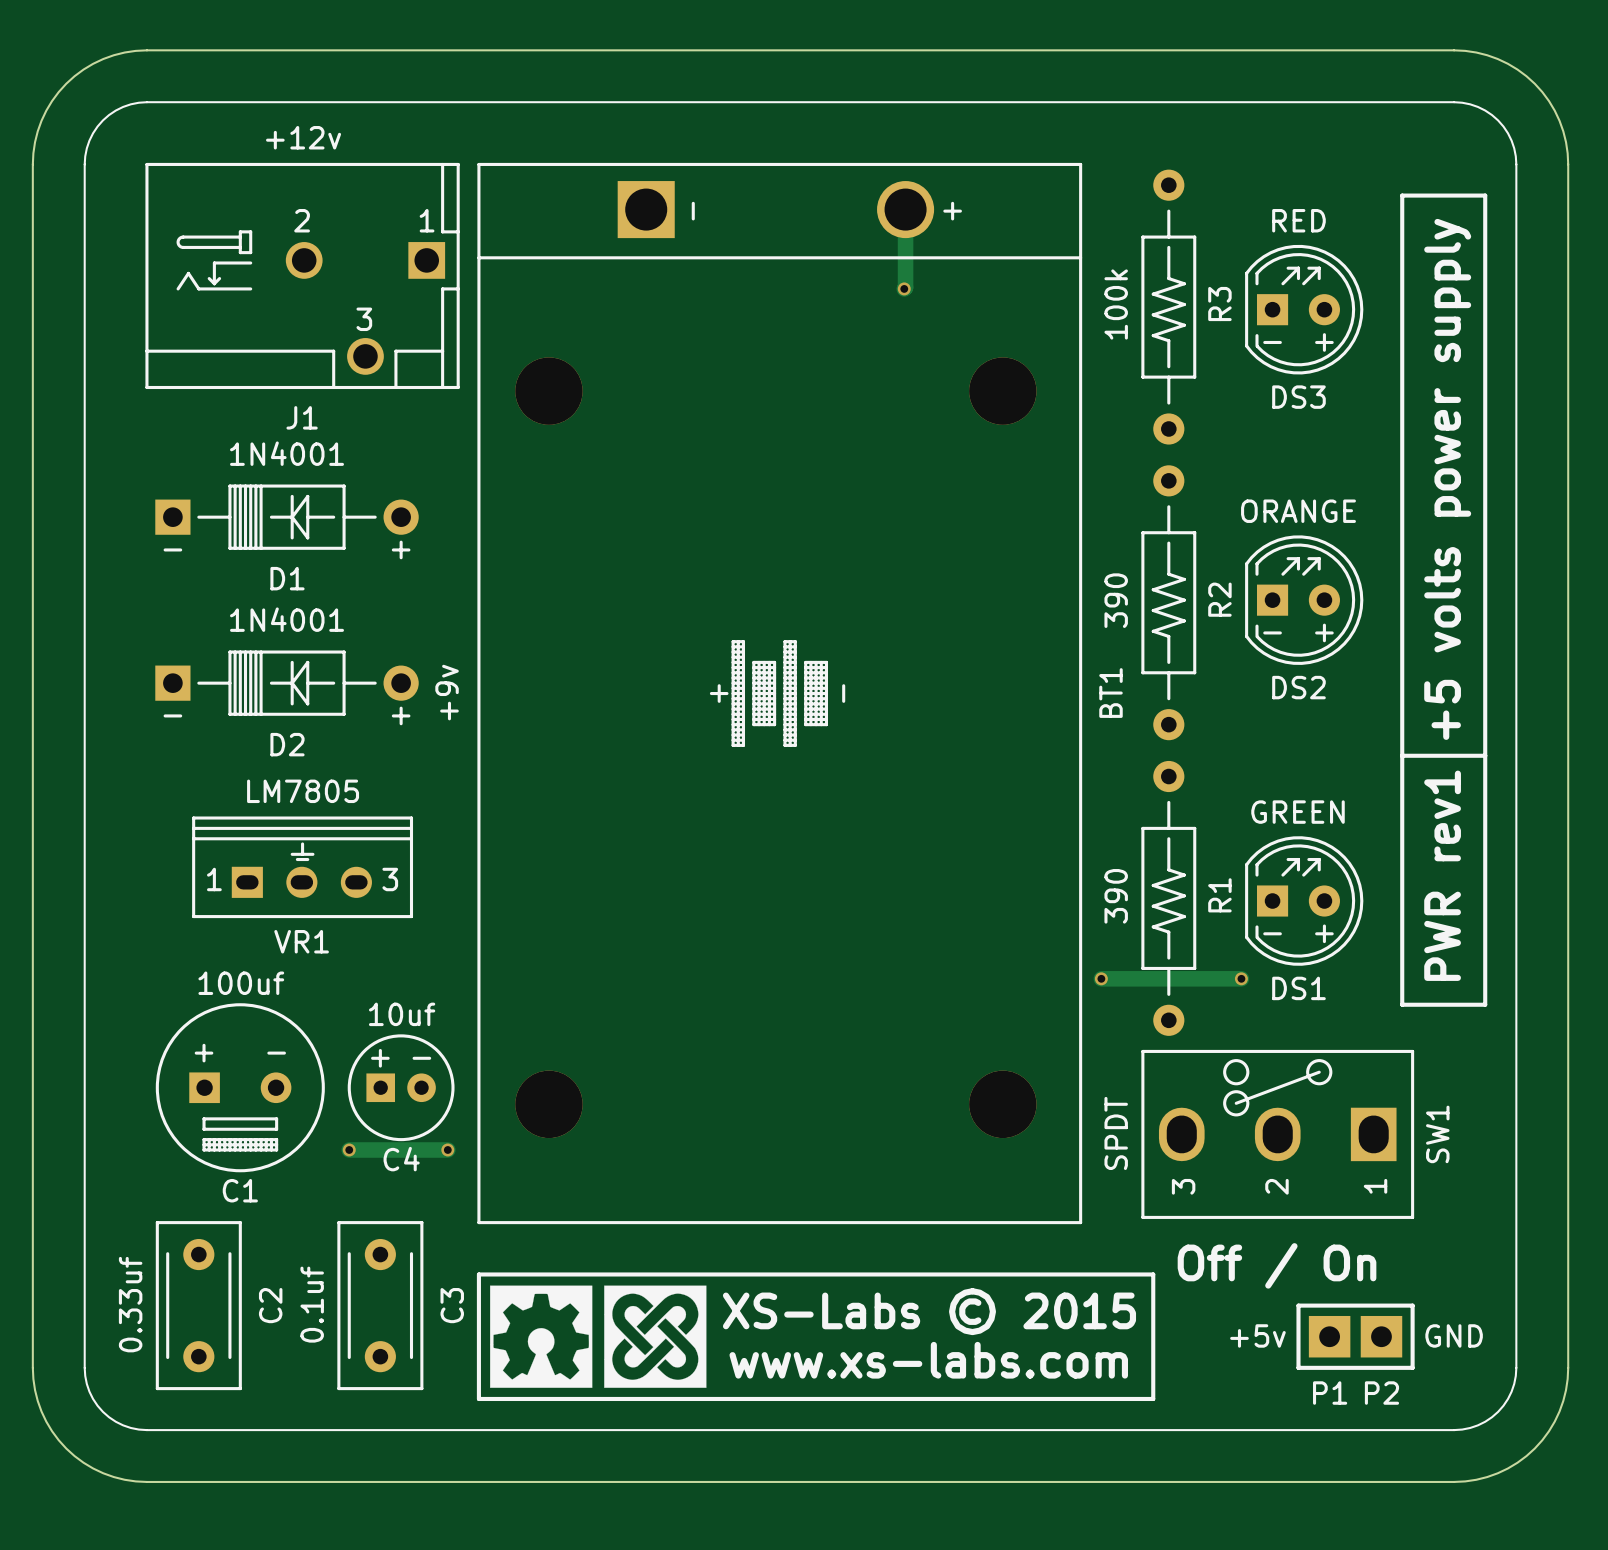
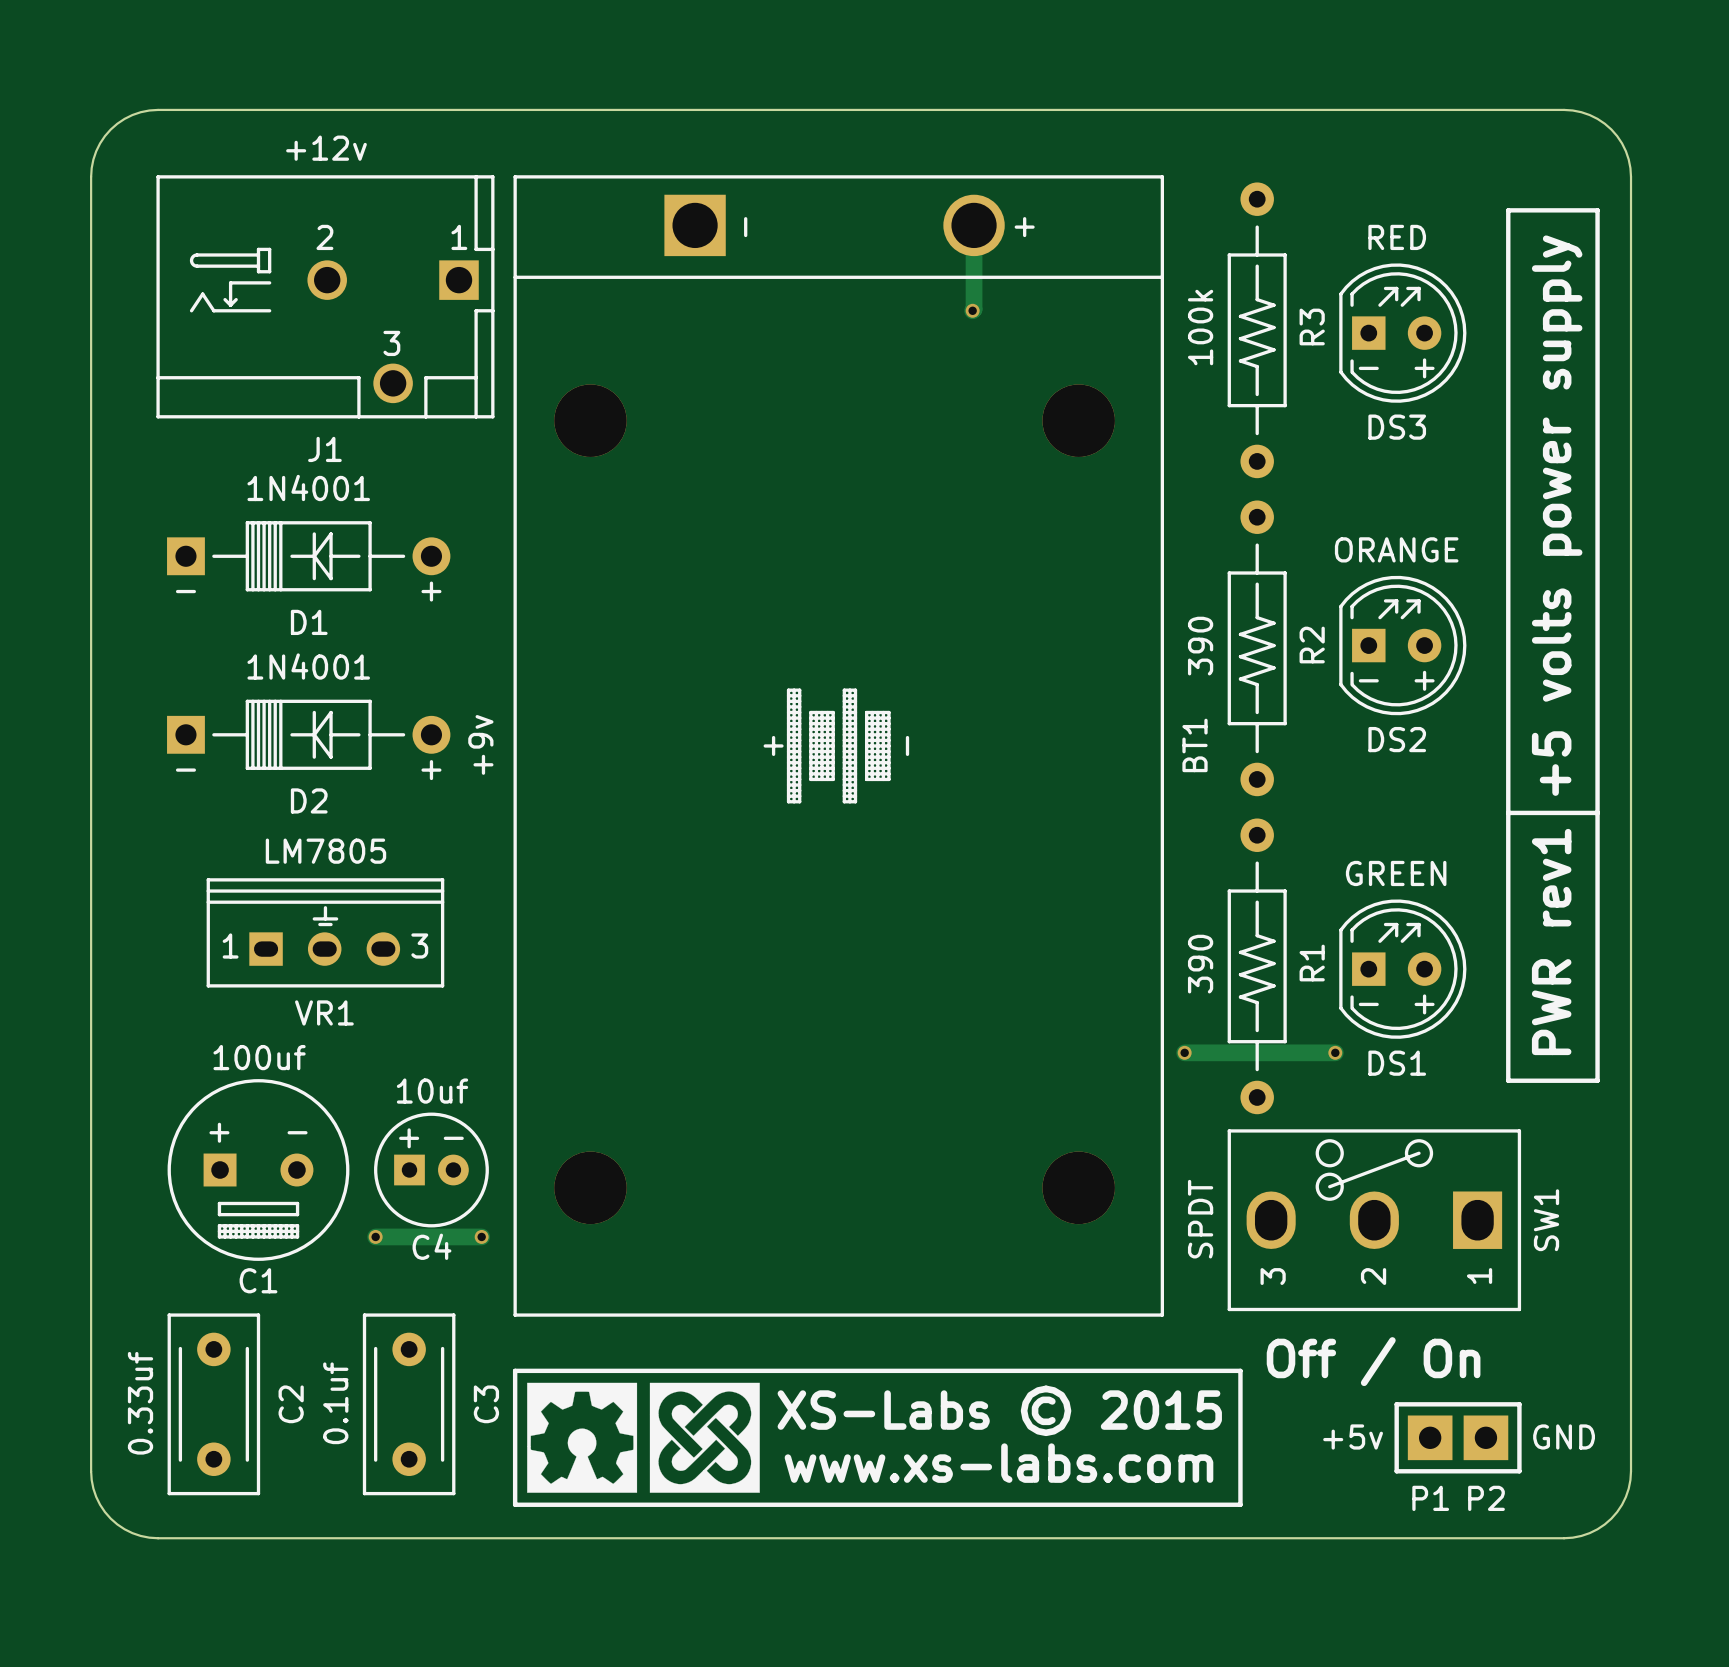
board edge: (146, 50) (1454, 50) (1476, 52) (1497, 59) (1517, 69) (1534, 83) (1548, 101) (1559, 120) (1566, 142) (1568, 164) (1568, 1367) (1566, 1390) (1559, 1411) (1548, 1431) (1534, 1448) (1517, 1462) (1497, 1473) (1476, 1479) (1454, 1481) (146, 1481) (124, 1479) (103, 1473) (83, 1462) (66, 1448) (52, 1431) (41, 1411) (35, 1390) (32, 1367) (33, 153) (37, 131) (46, 110) (58, 92) (74, 76) (103, 59) (124, 52) (146, 50) -> (158, 109) (132, 115) (110, 129) (96, 151) (91, 176) (91, 1471) (96, 1496) (110, 1518) (132, 1533) (158, 1538) (1564, 1538) (1589, 1533) (1611, 1518) (1625, 1496) (1631, 1471) (1631, 176) (1625, 151) (1611, 129) (1589, 115) (1564, 109) (158, 109)
line: (146, 102) (1454, 102) (1477, 106) (1498, 120) (1511, 140) (1516, 164) (1516, 1367) (1511, 1391) (1498, 1411) (1477, 1425) (1454, 1430) (146, 1430) (123, 1425) (102, 1411) (89, 1391) (84, 1367) (84, 164) (89, 140) (102, 120) (123, 106) (146, 102) -> none

